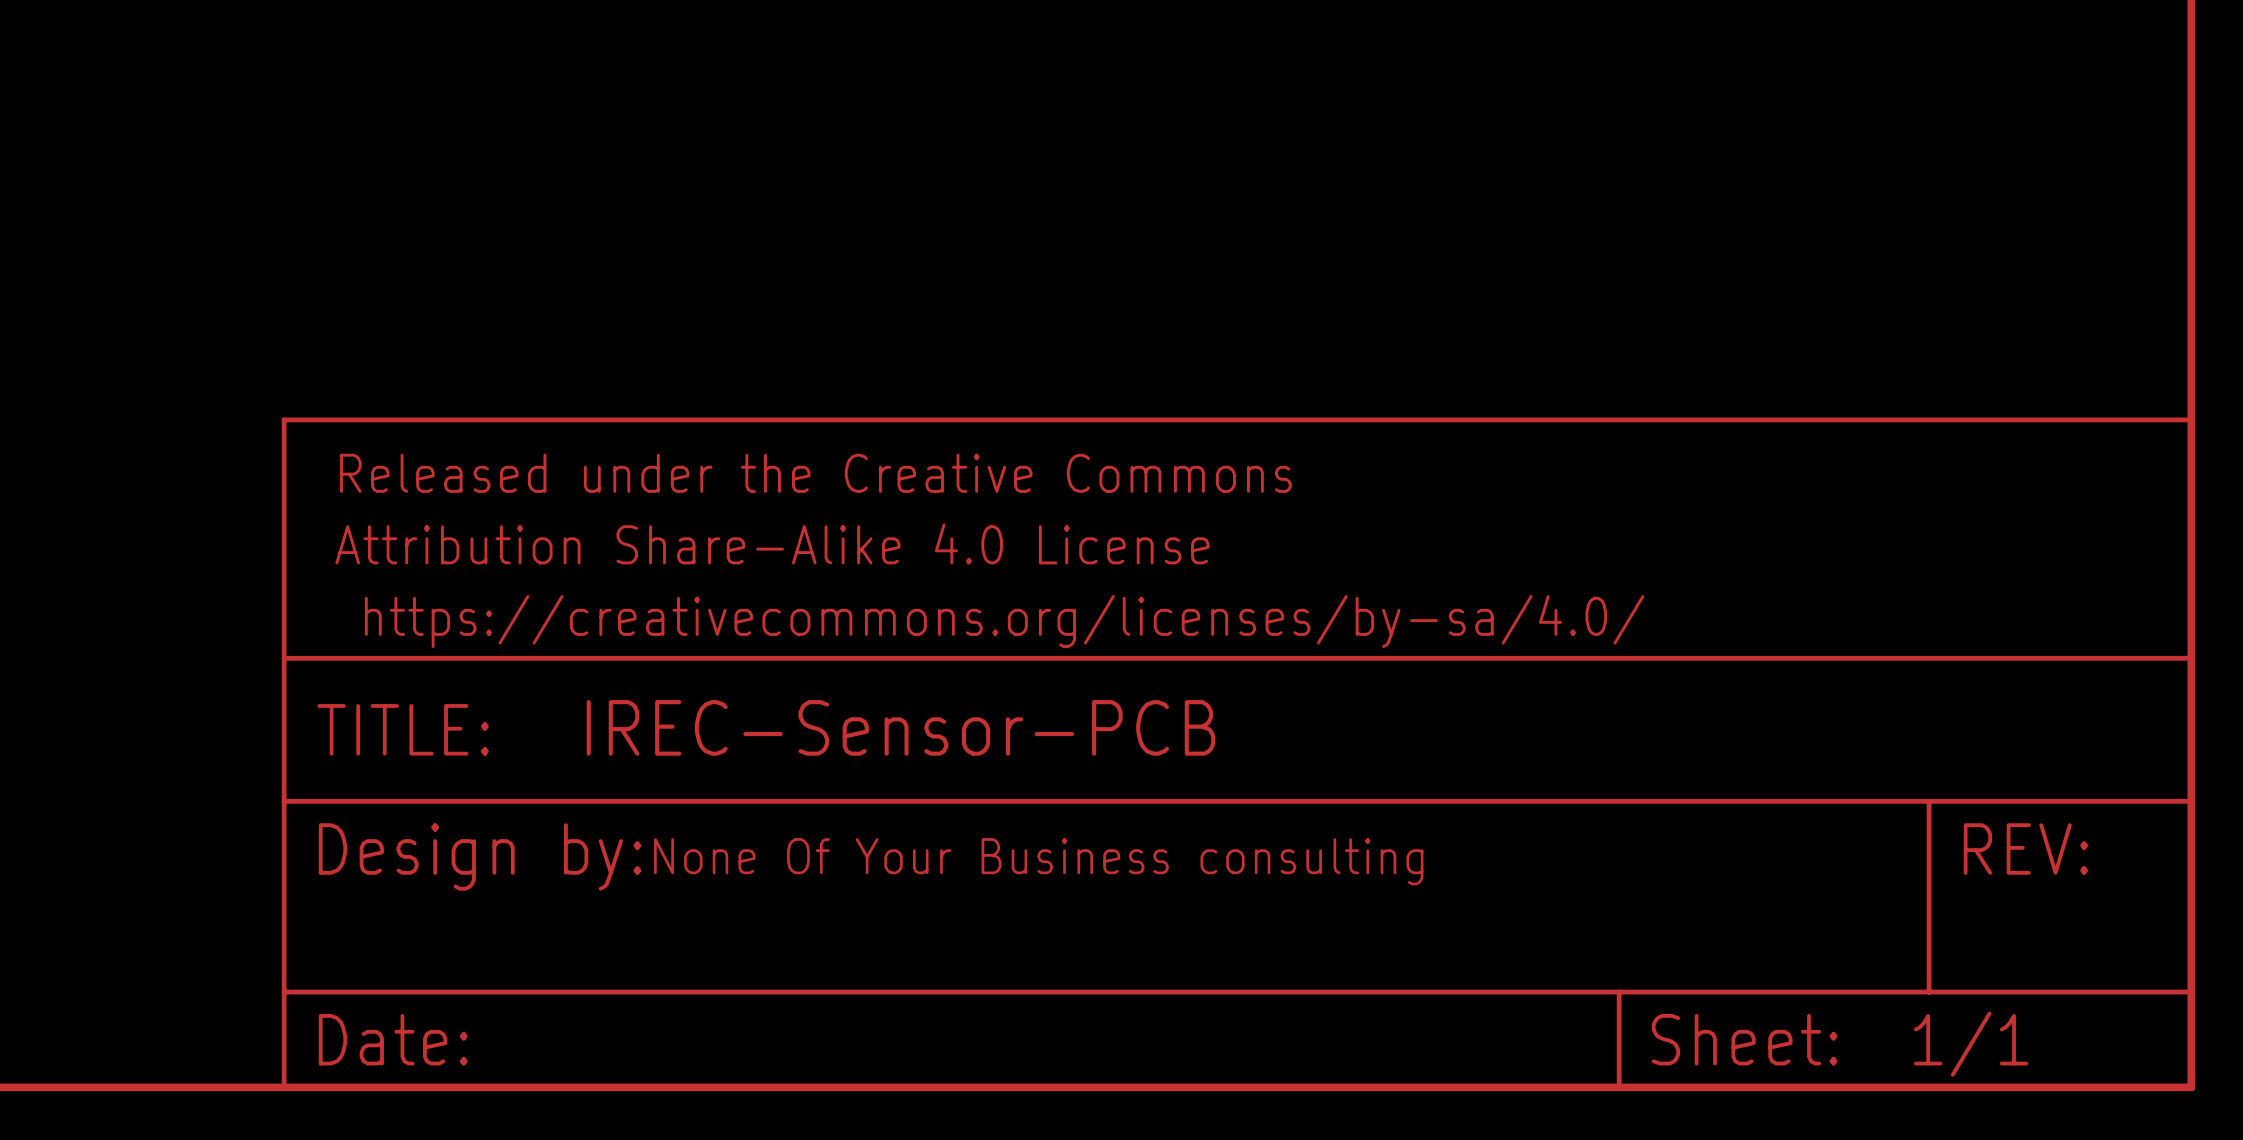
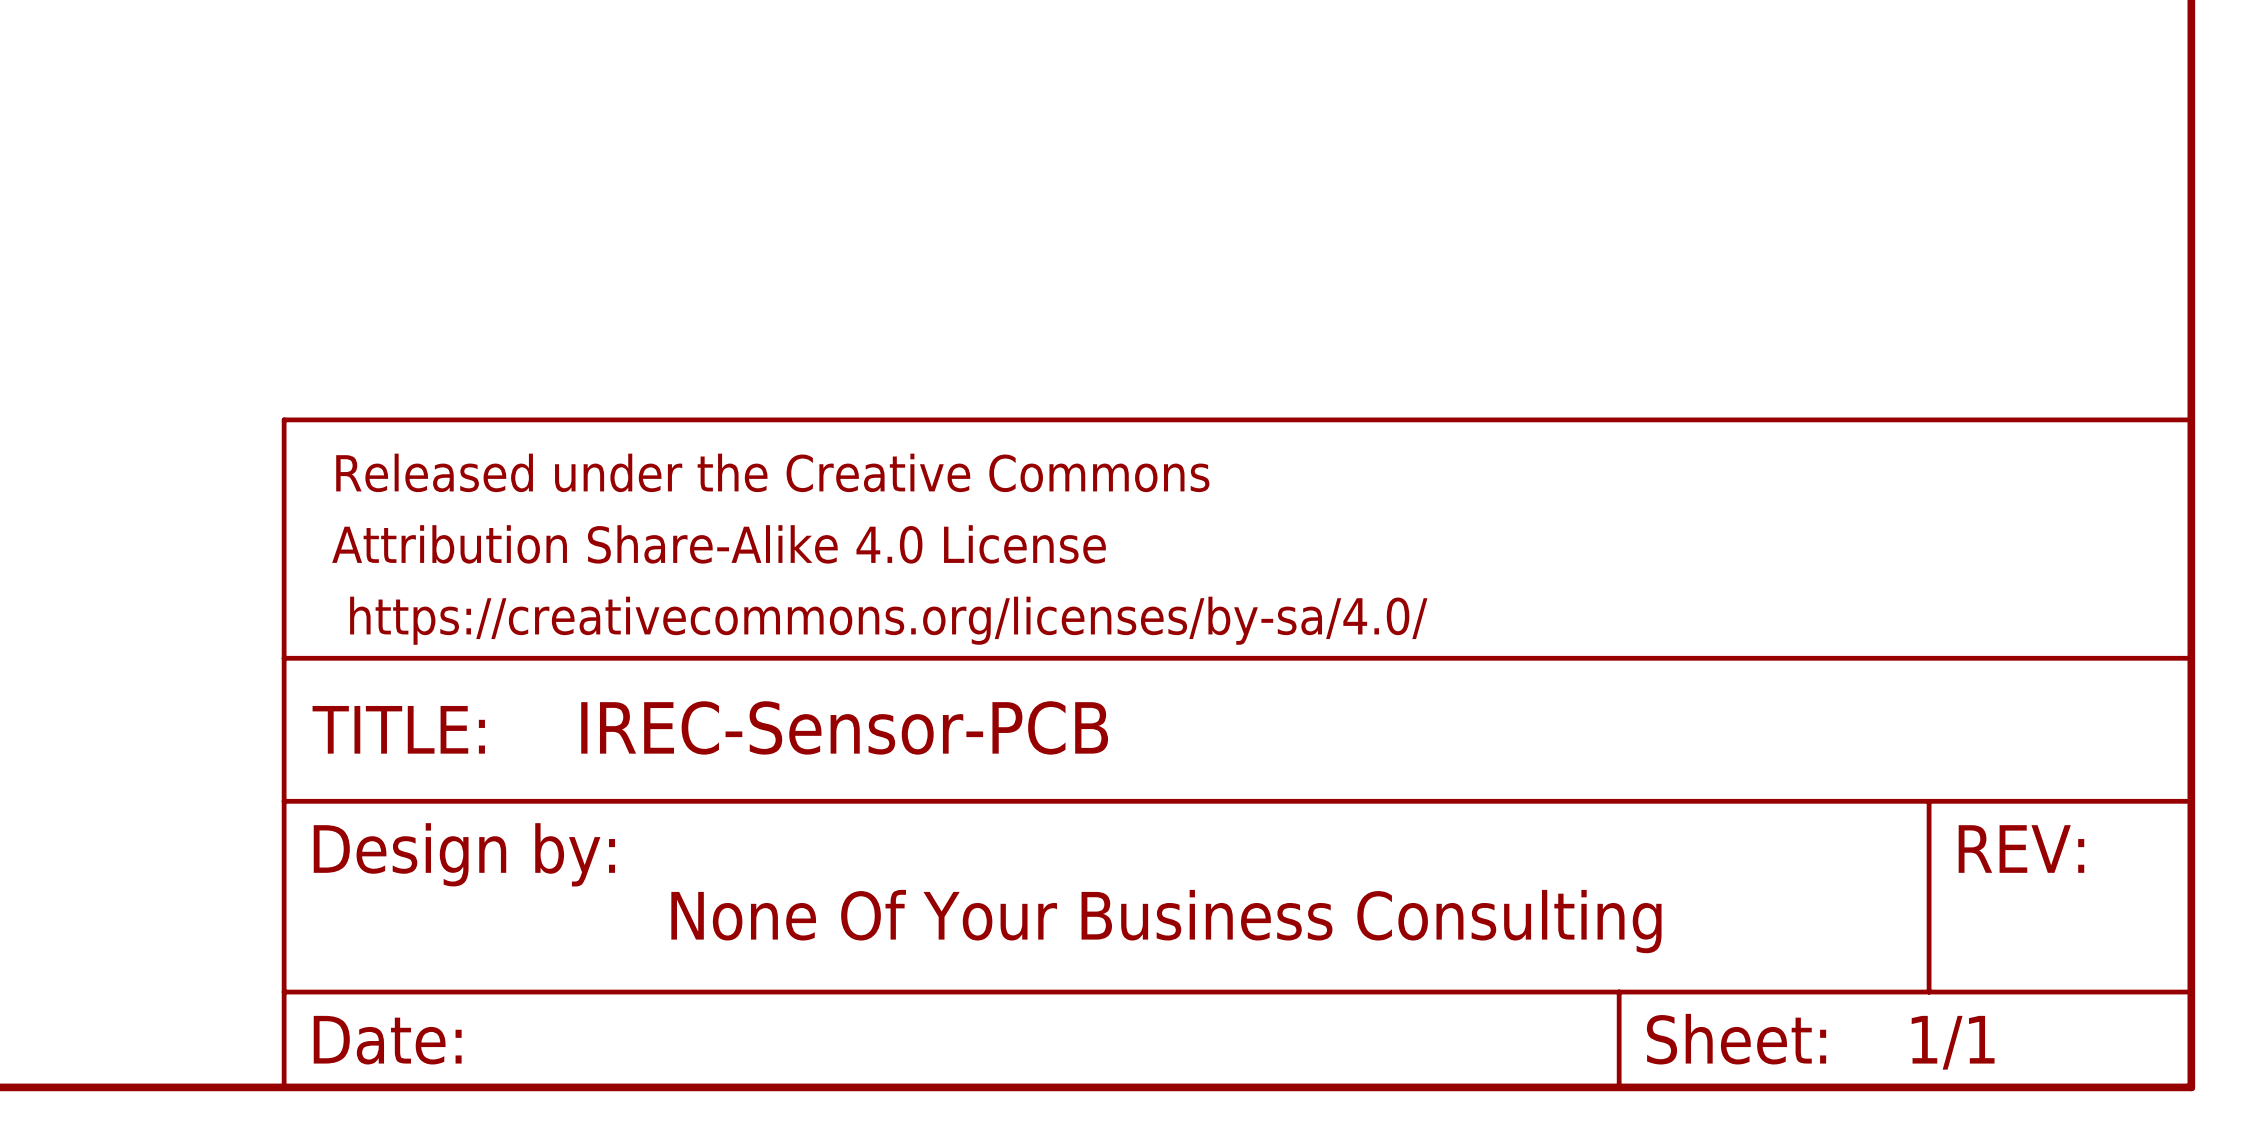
text: None Of Your Business consulting (1038, 861) -> None Of Your Business Consulting (1166, 921)

